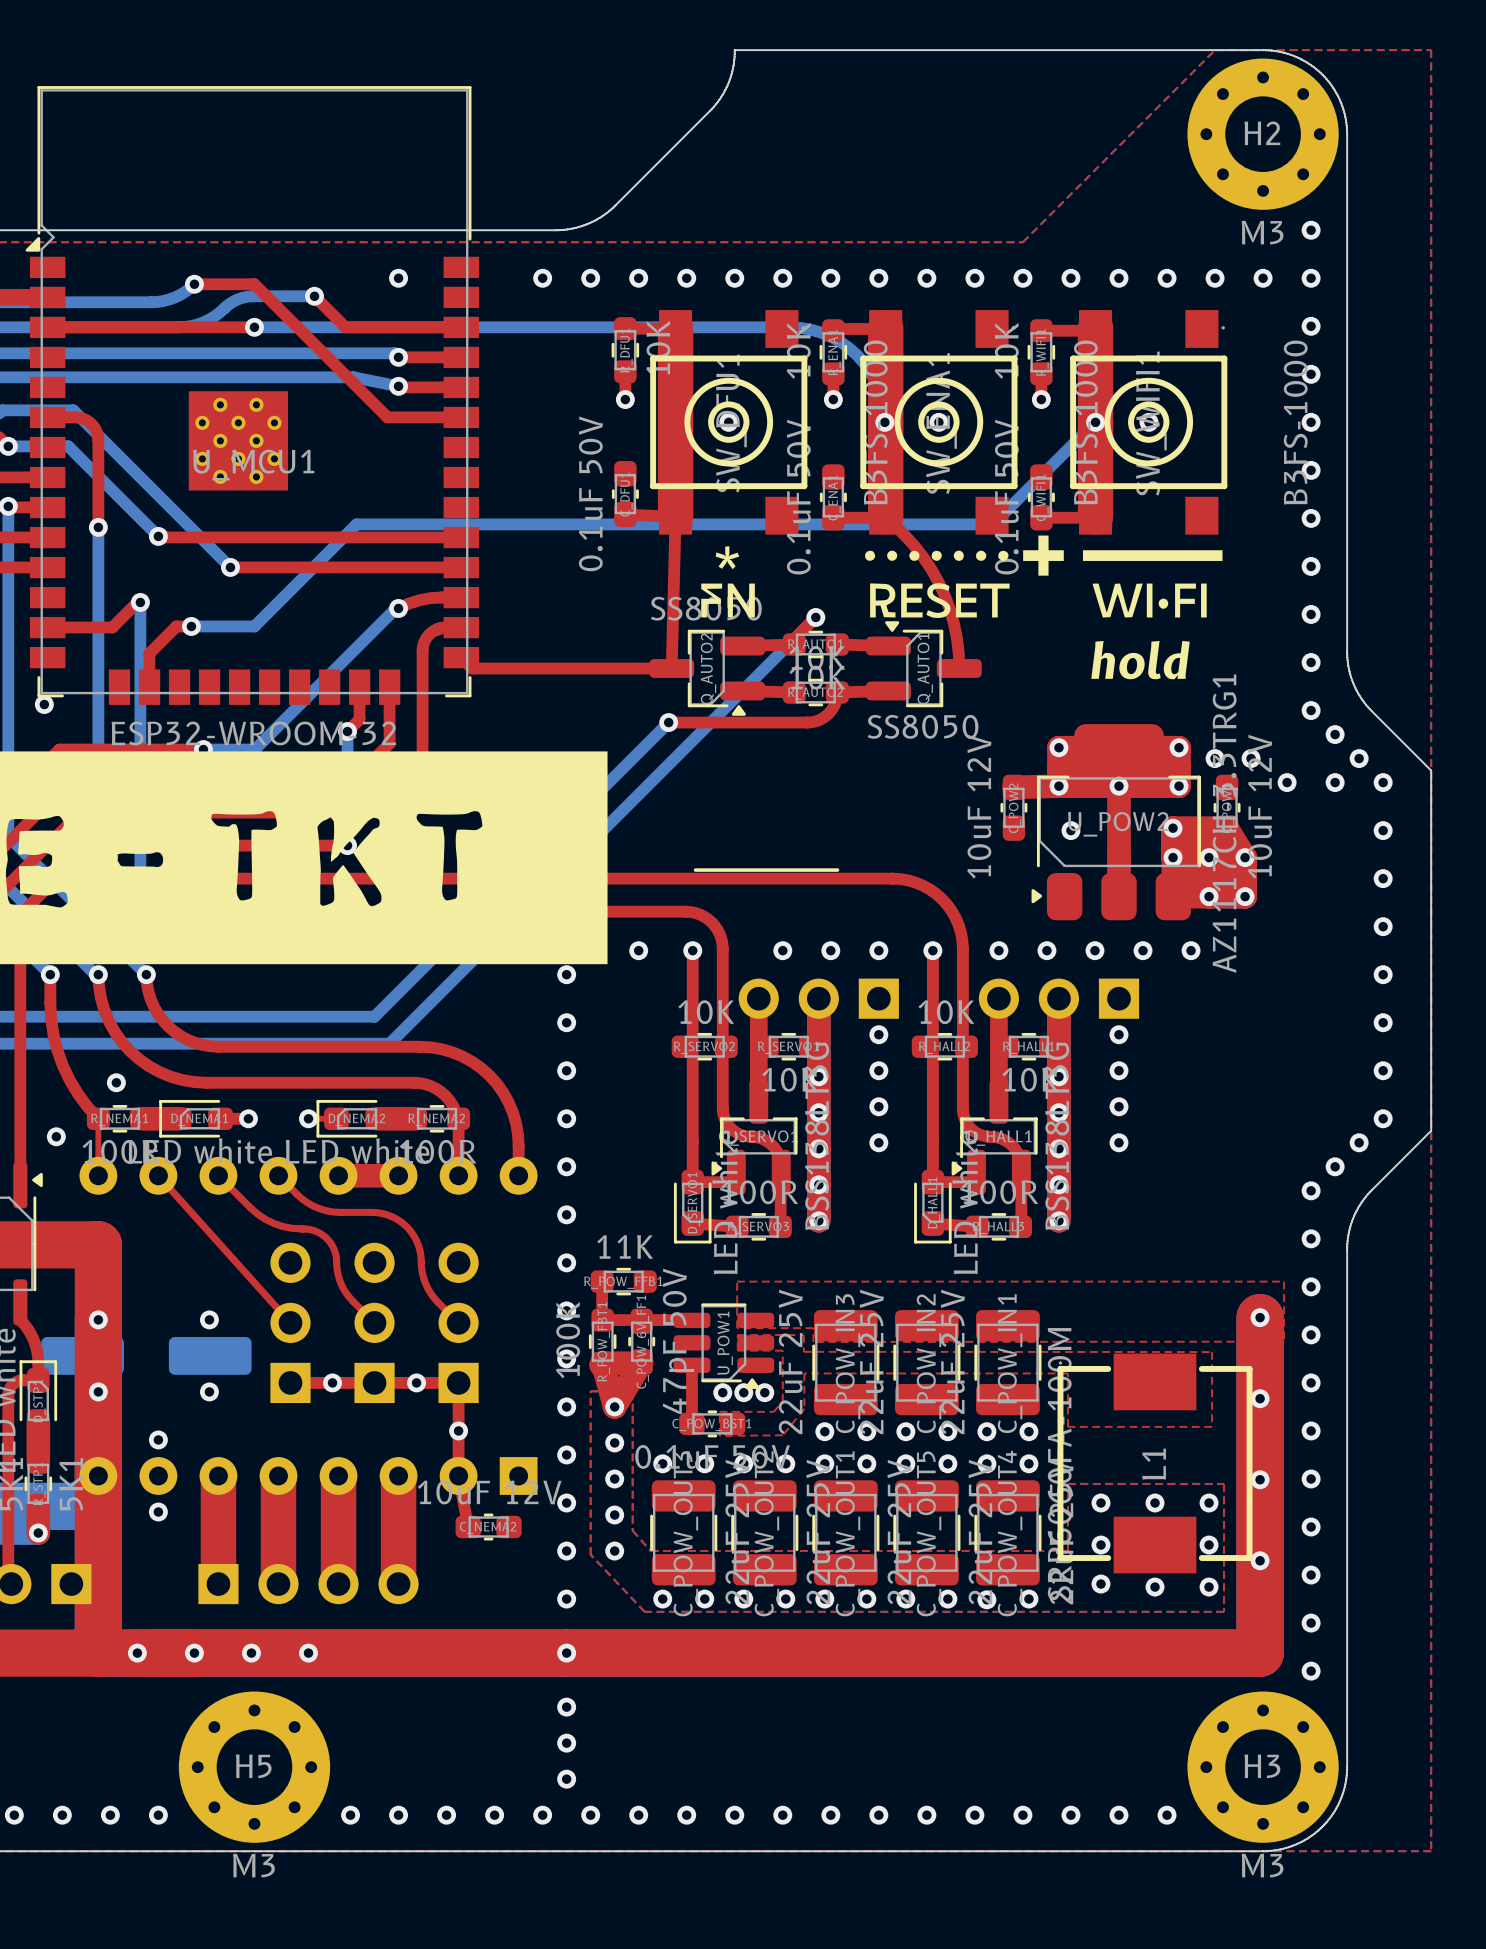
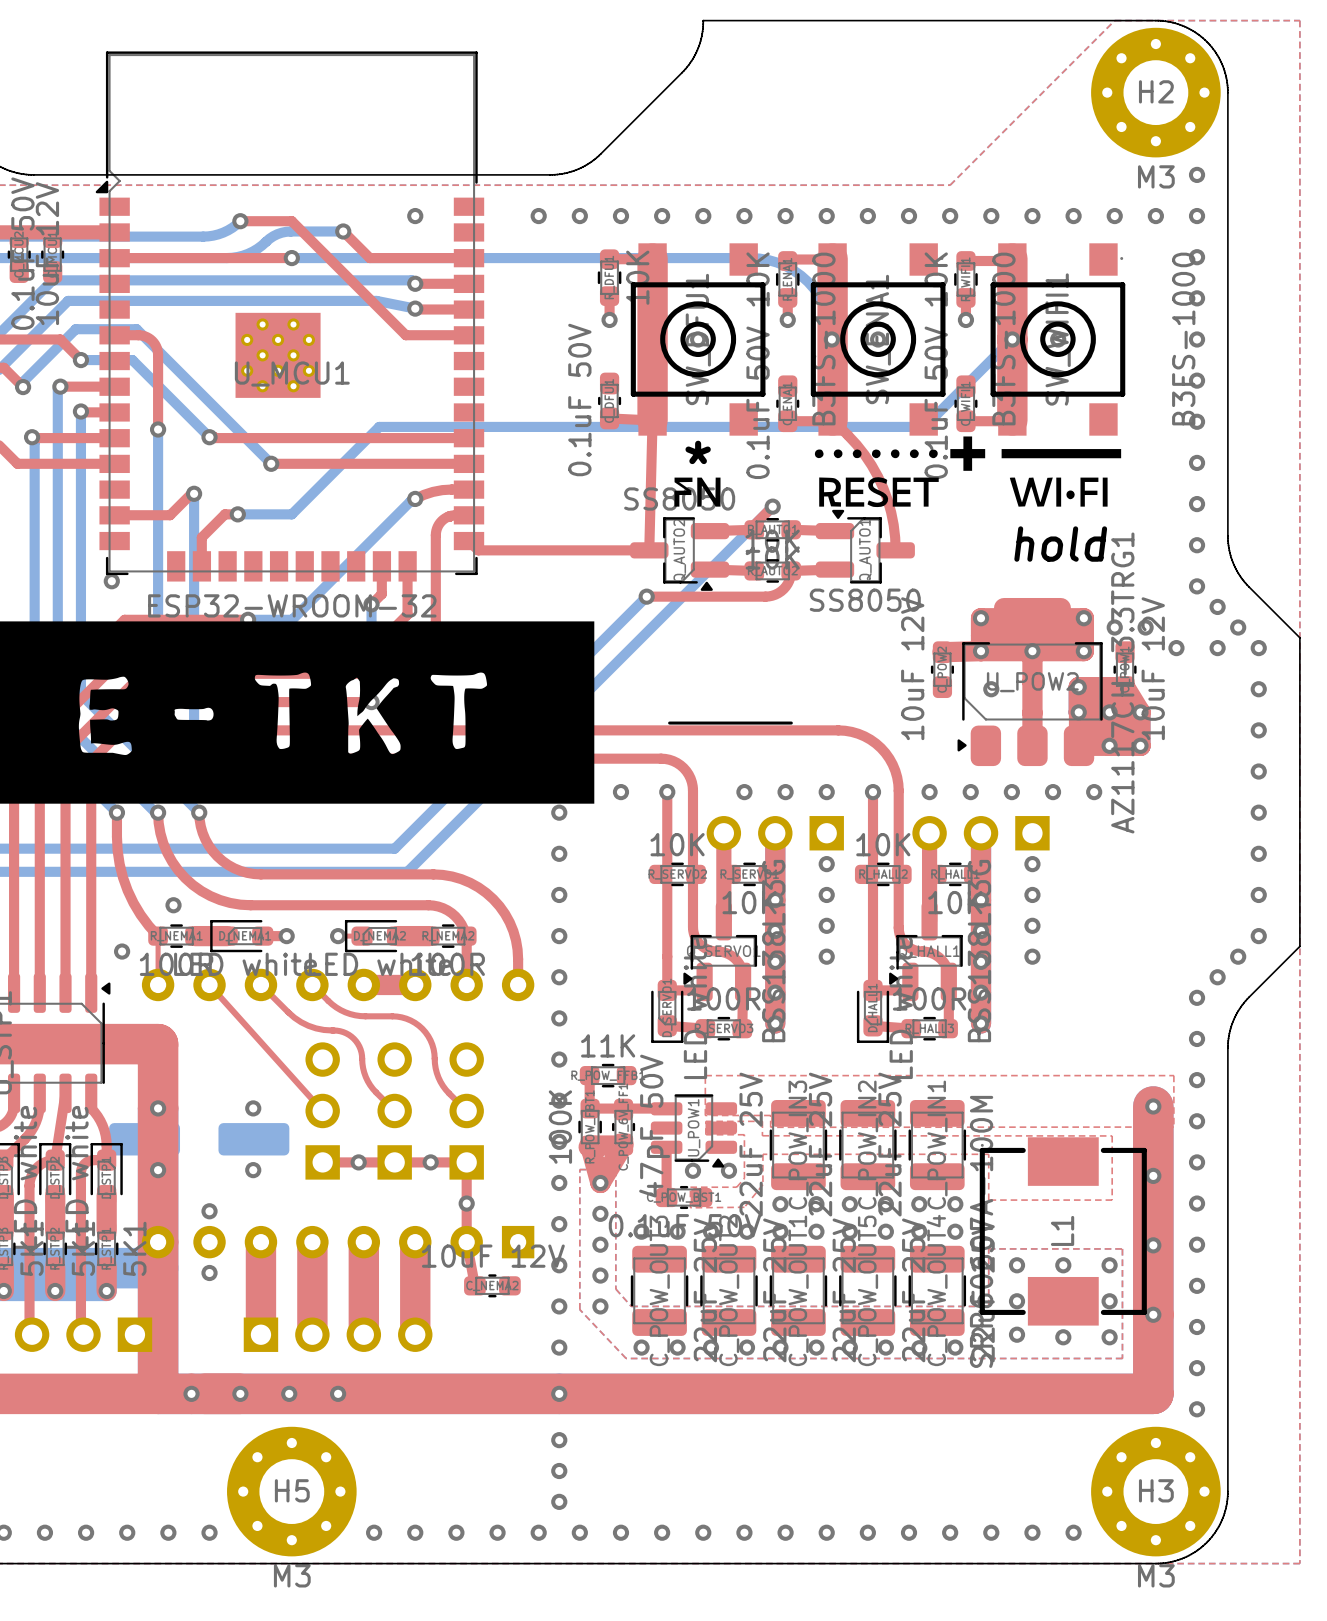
via: (743, 1392) -> none

